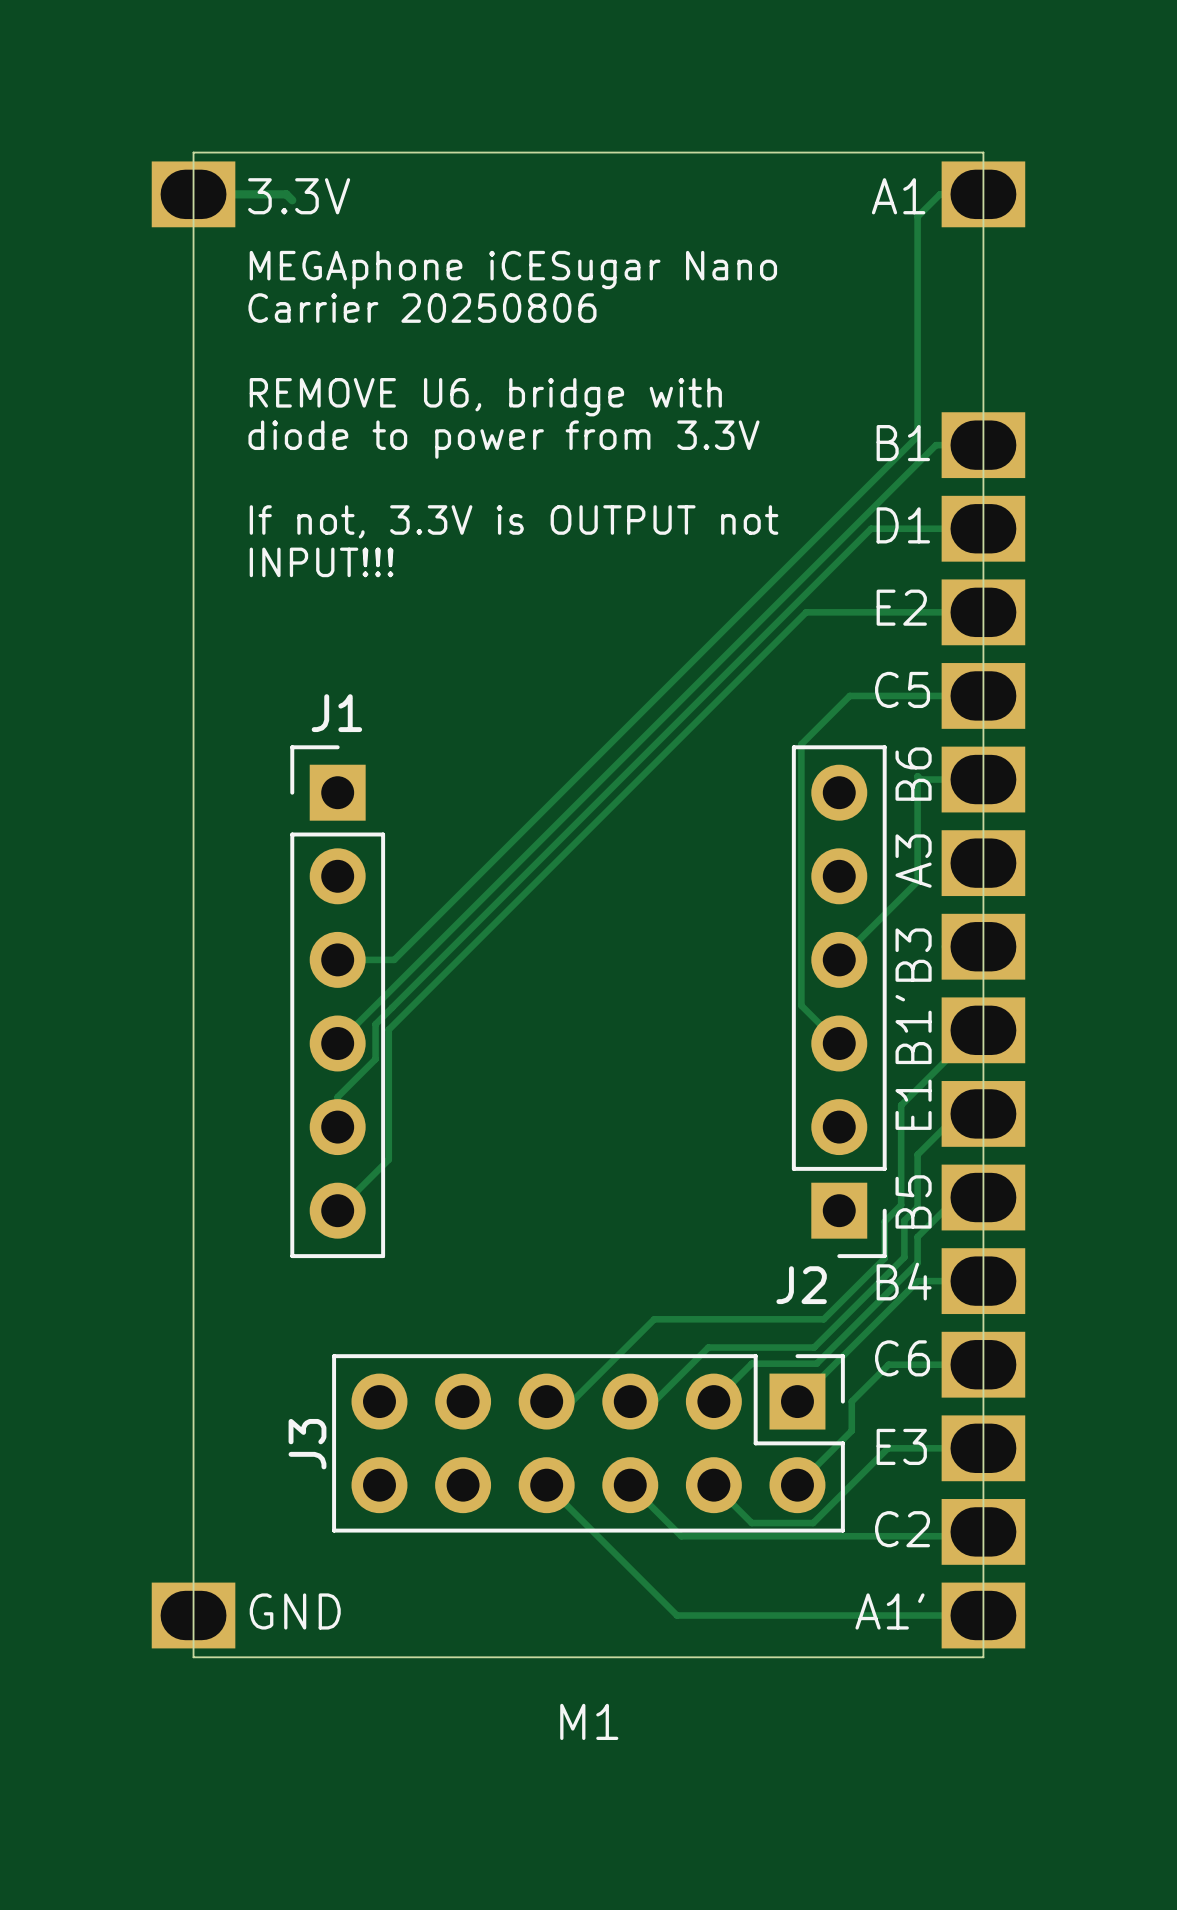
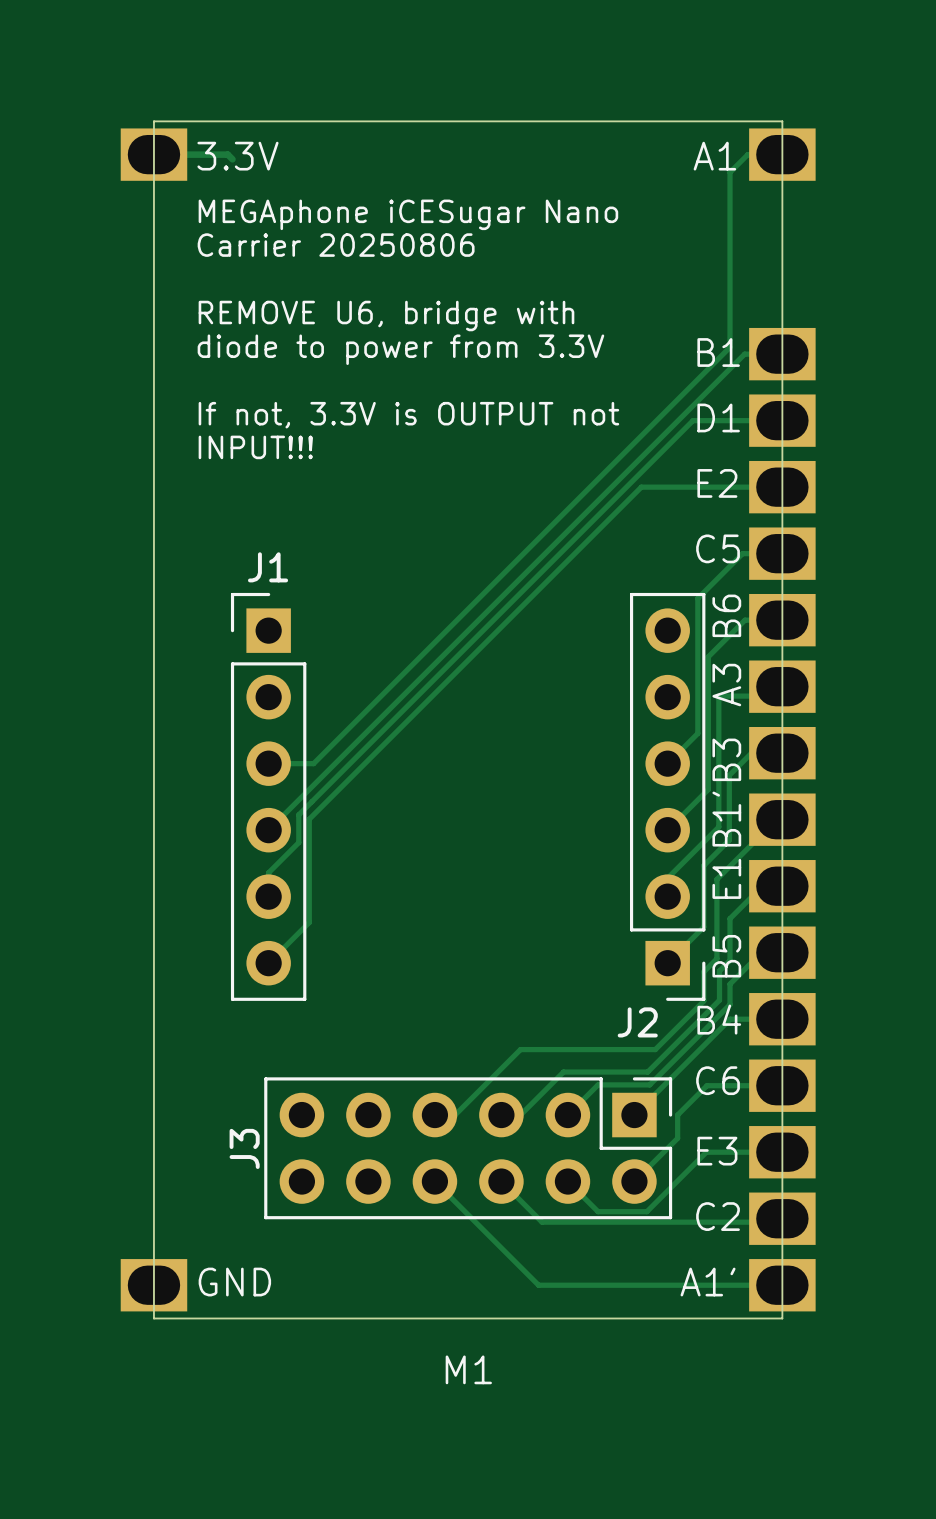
track: (933, 695) (849, 695) (801, 744) (801, 1005) (839, 1043) -> (744, 620) (708, 656) (708, 789) (667, 830)
track: (936, 779) (920, 779) (917, 776) (917, 881) (877, 922) -> (742, 553) (697, 598) (697, 733)
track: none -> (782, 686) (772, 696) (718, 696) (718, 827) (667, 878)
track: none -> (751, 753) (729, 775) (729, 840) (703, 865) (703, 927) (667, 963)

